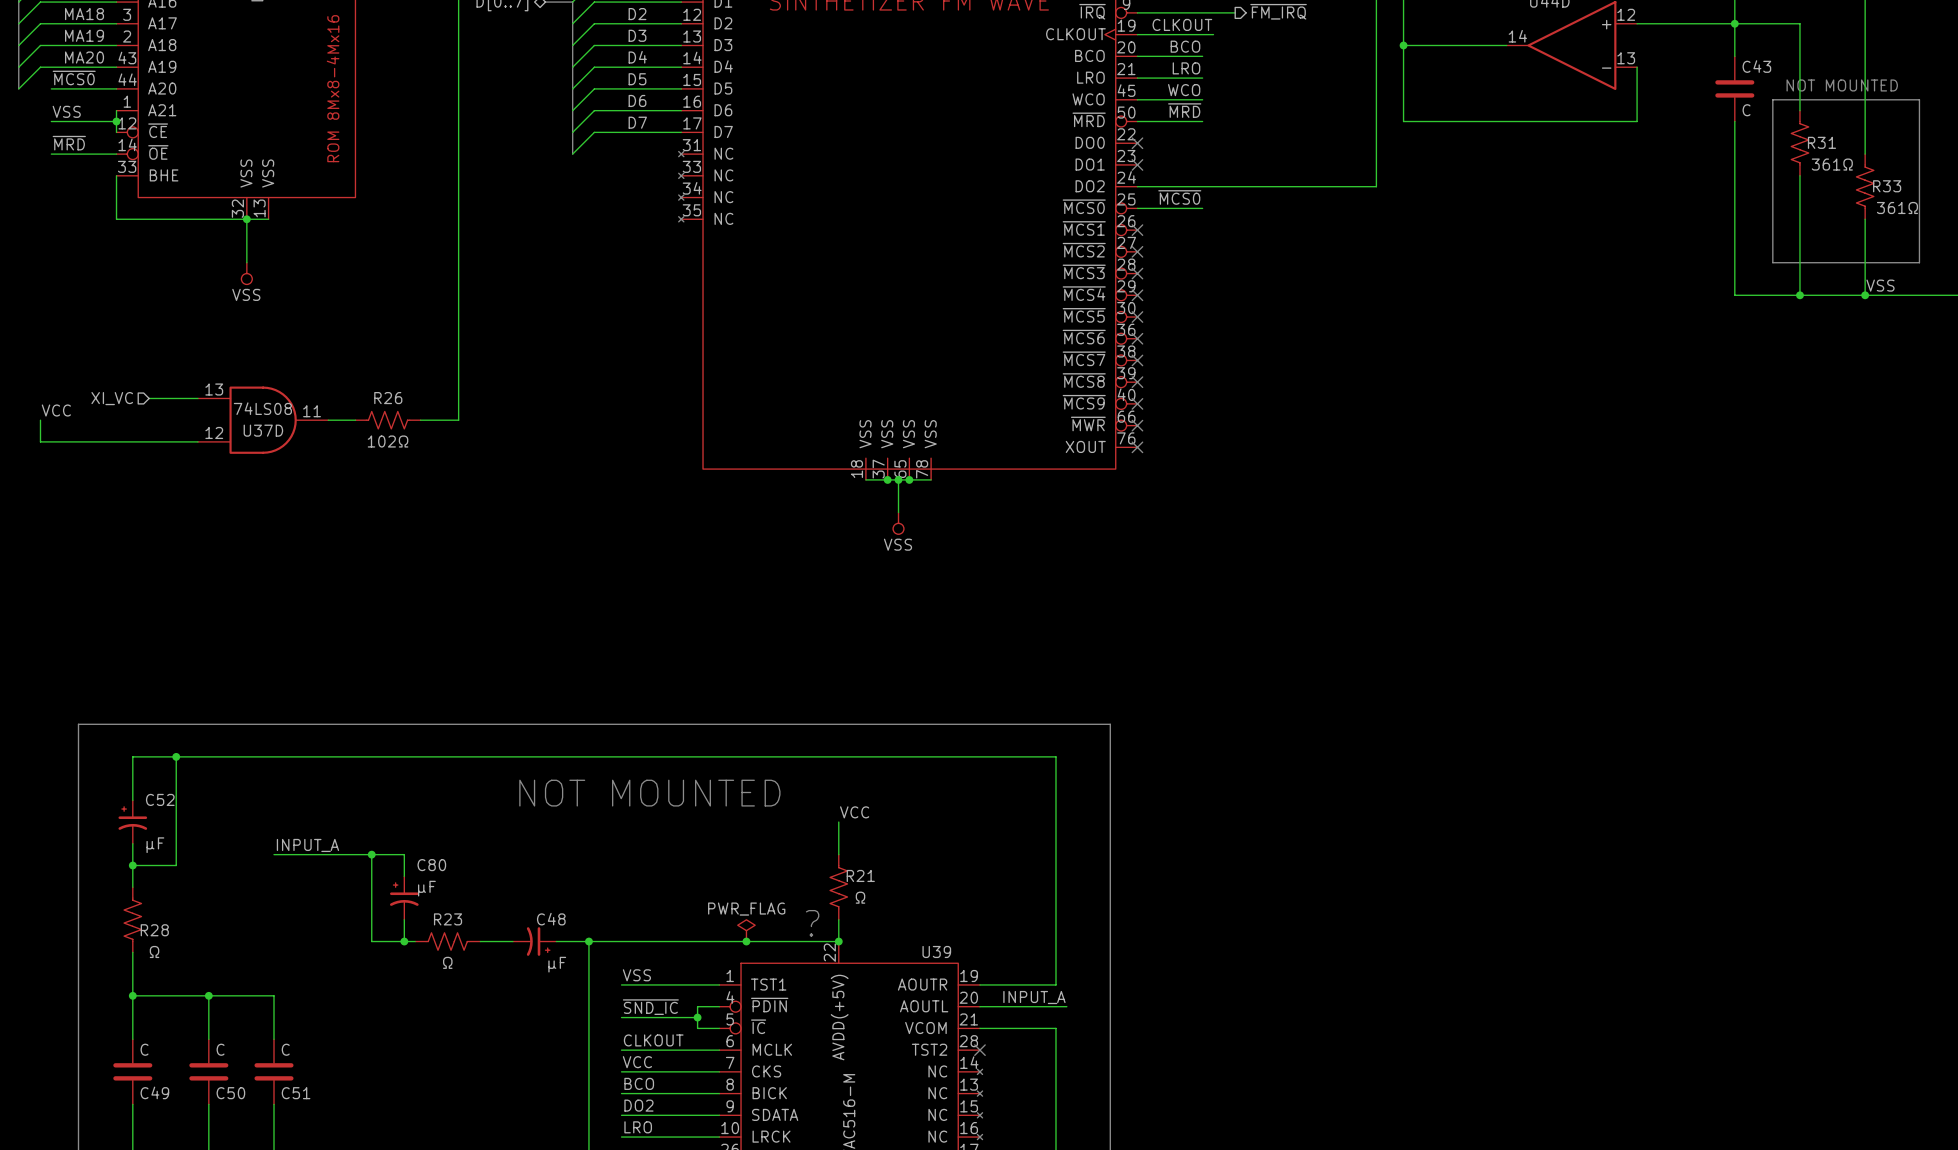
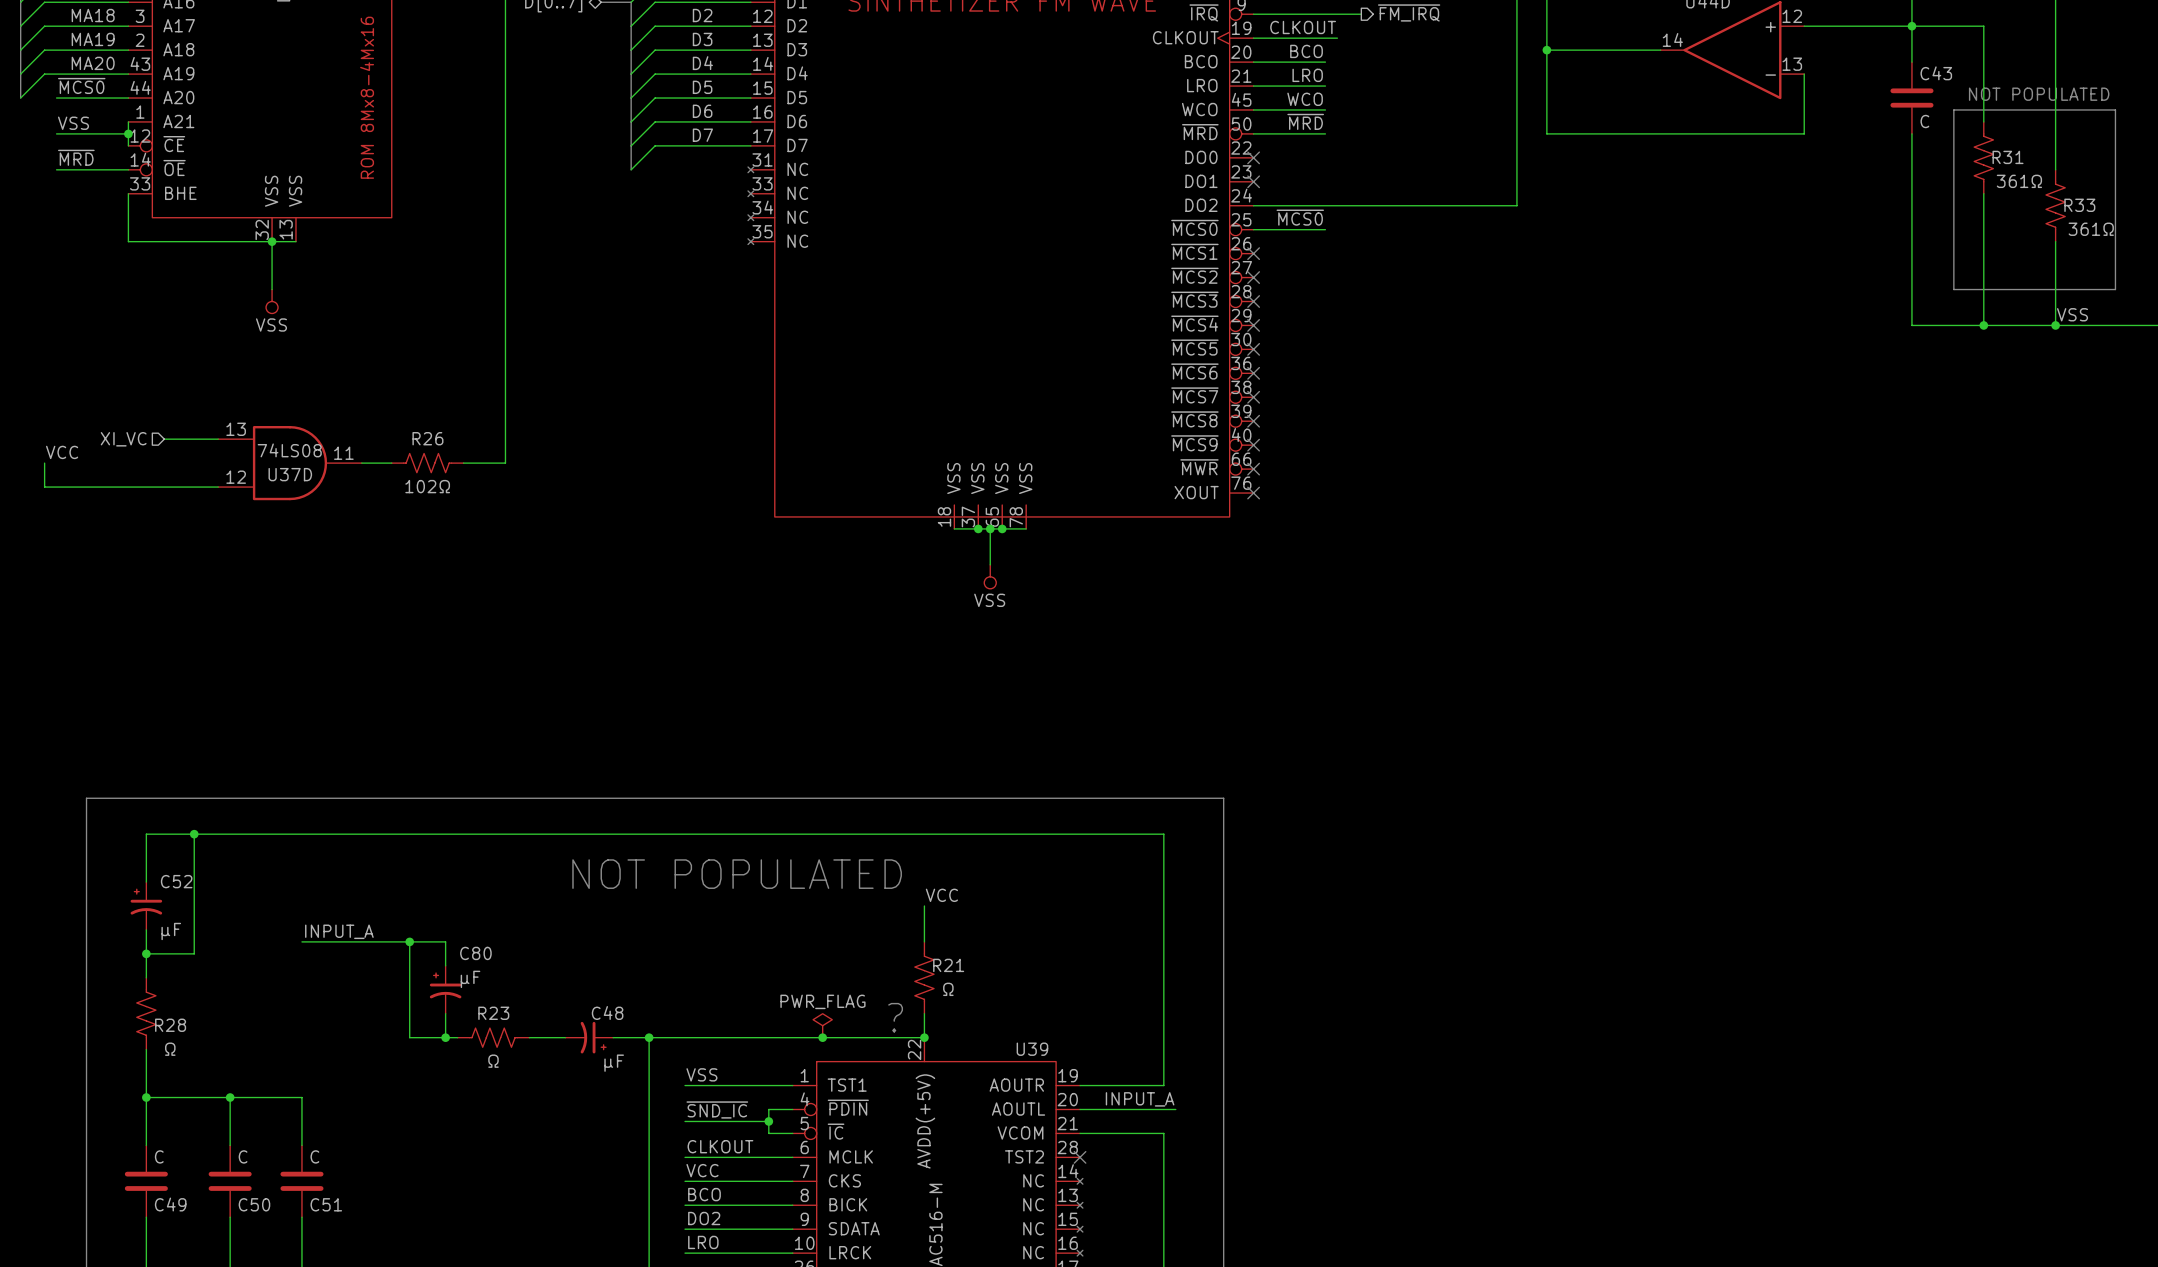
text: NOT MOUNTED (1842, 85) -> NOT POPULATED (2039, 94)
text: NOT MOUNTED (649, 793) -> NOT POPULATED (737, 874)

